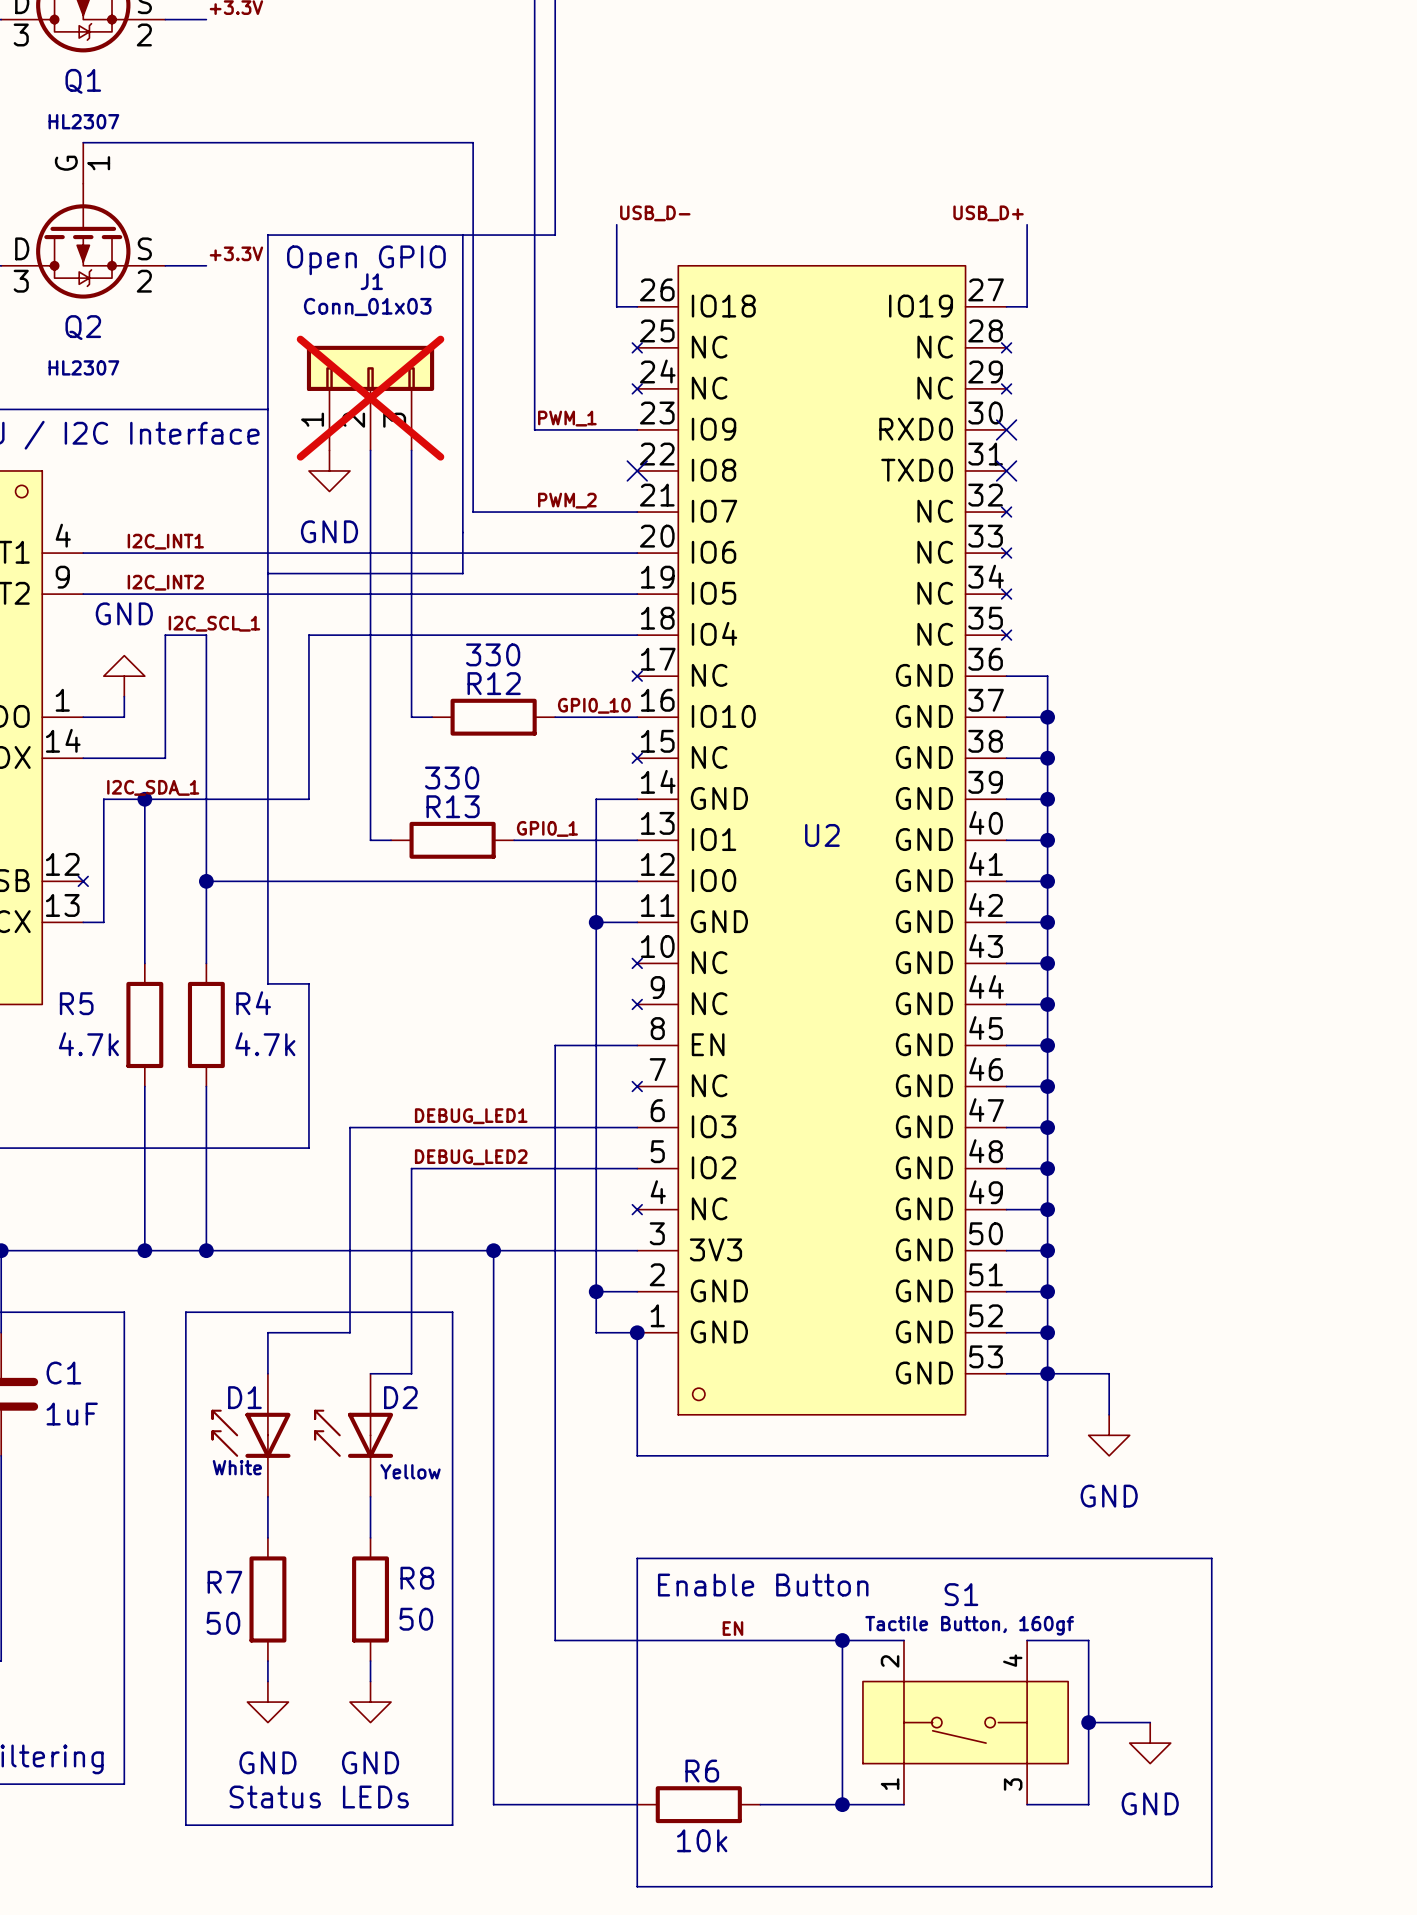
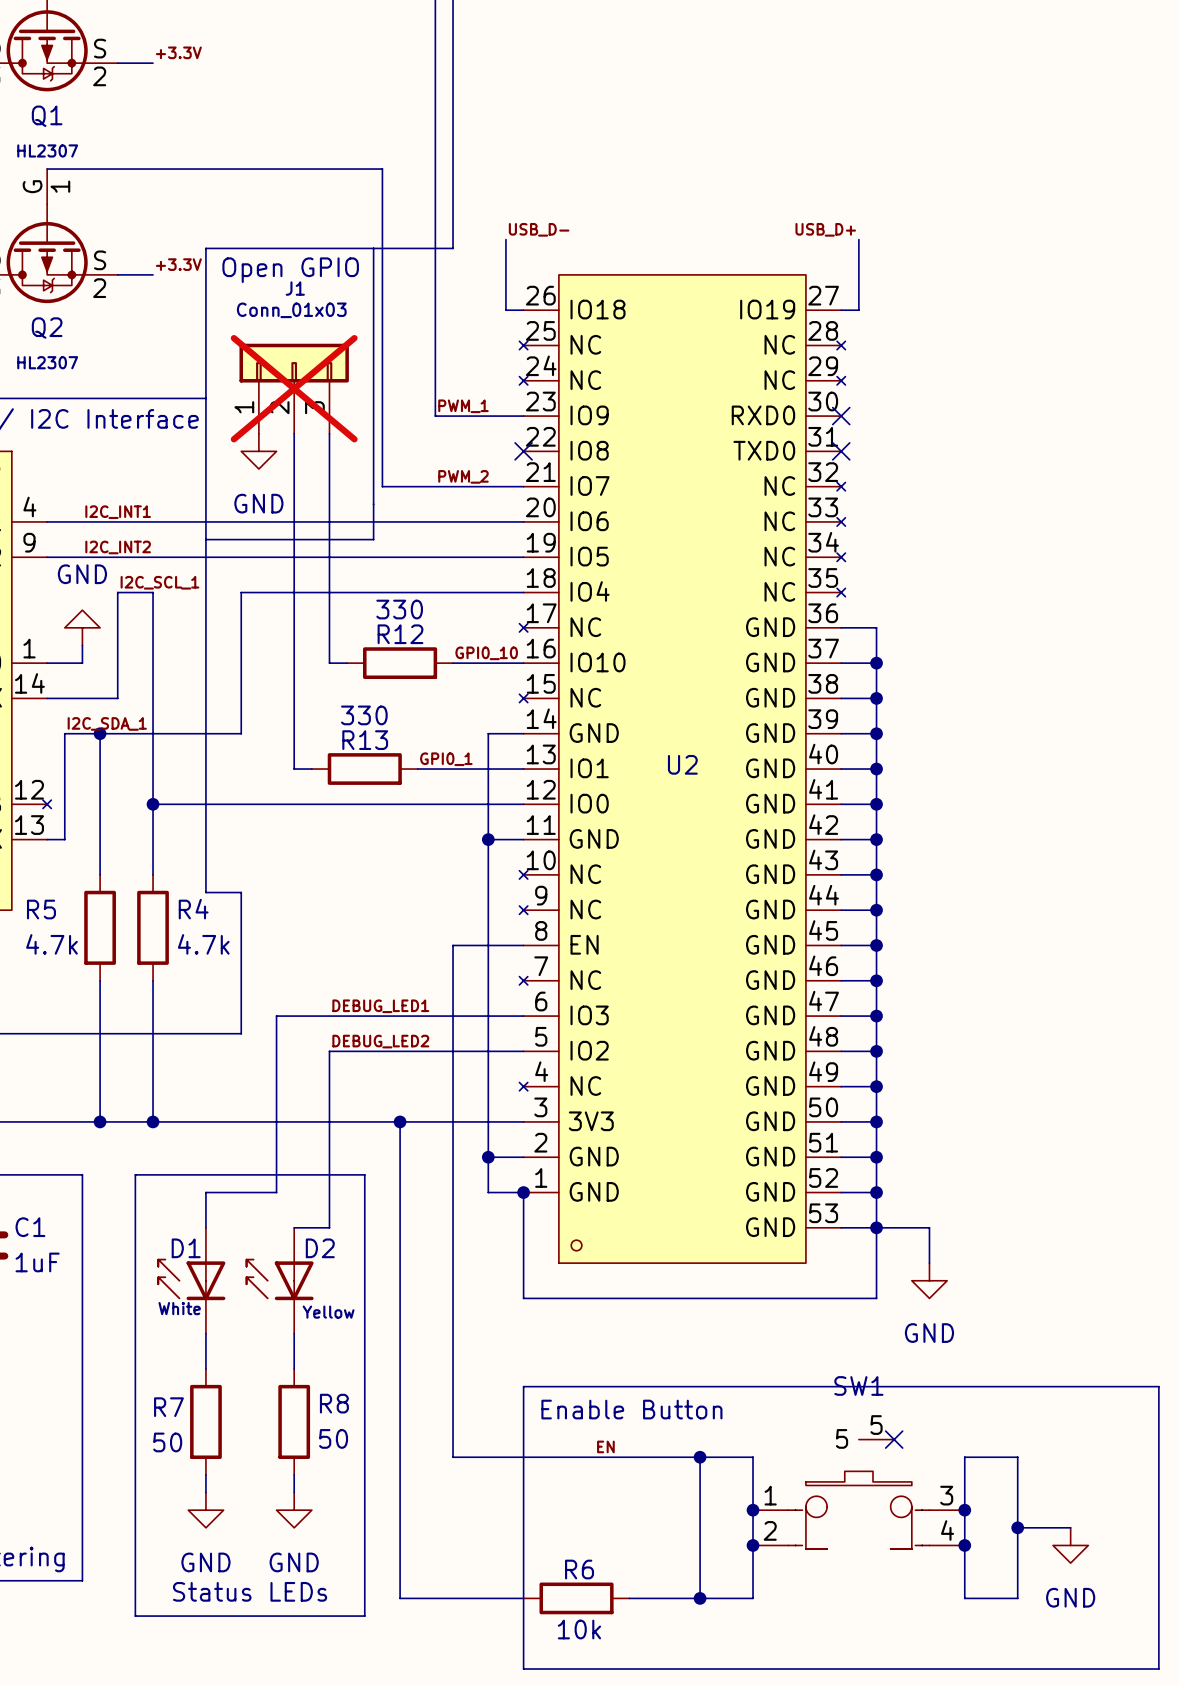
line: (1211, 1558) (1211, 1886) -> (1017, 1386) (1158, 1386) (1158, 1669) (1017, 1669)
no-connect mark: none -> (894, 1439)
wire: (1027, 1640) (1088, 1640) (1088, 1804) (1027, 1804) -> none
wire: none -> (964, 1457) (964, 1598) (1017, 1598) (1017, 1457) (964, 1457)
SW1: none -> (858, 1494)
junction: none -> (753, 1510)
junction: none -> (964, 1510)
S1: Tactile Button, 160gf (965, 1722) -> none
wire: (1088, 1722) (1150, 1722) -> (1017, 1527) (1070, 1527)
junction: (1088, 1722) -> none
junction: none -> (1017, 1527)
junction: none -> (753, 1545)
junction: none -> (964, 1545)
power symbol position: GND (1150, 1743) -> GND (1070, 1545)

